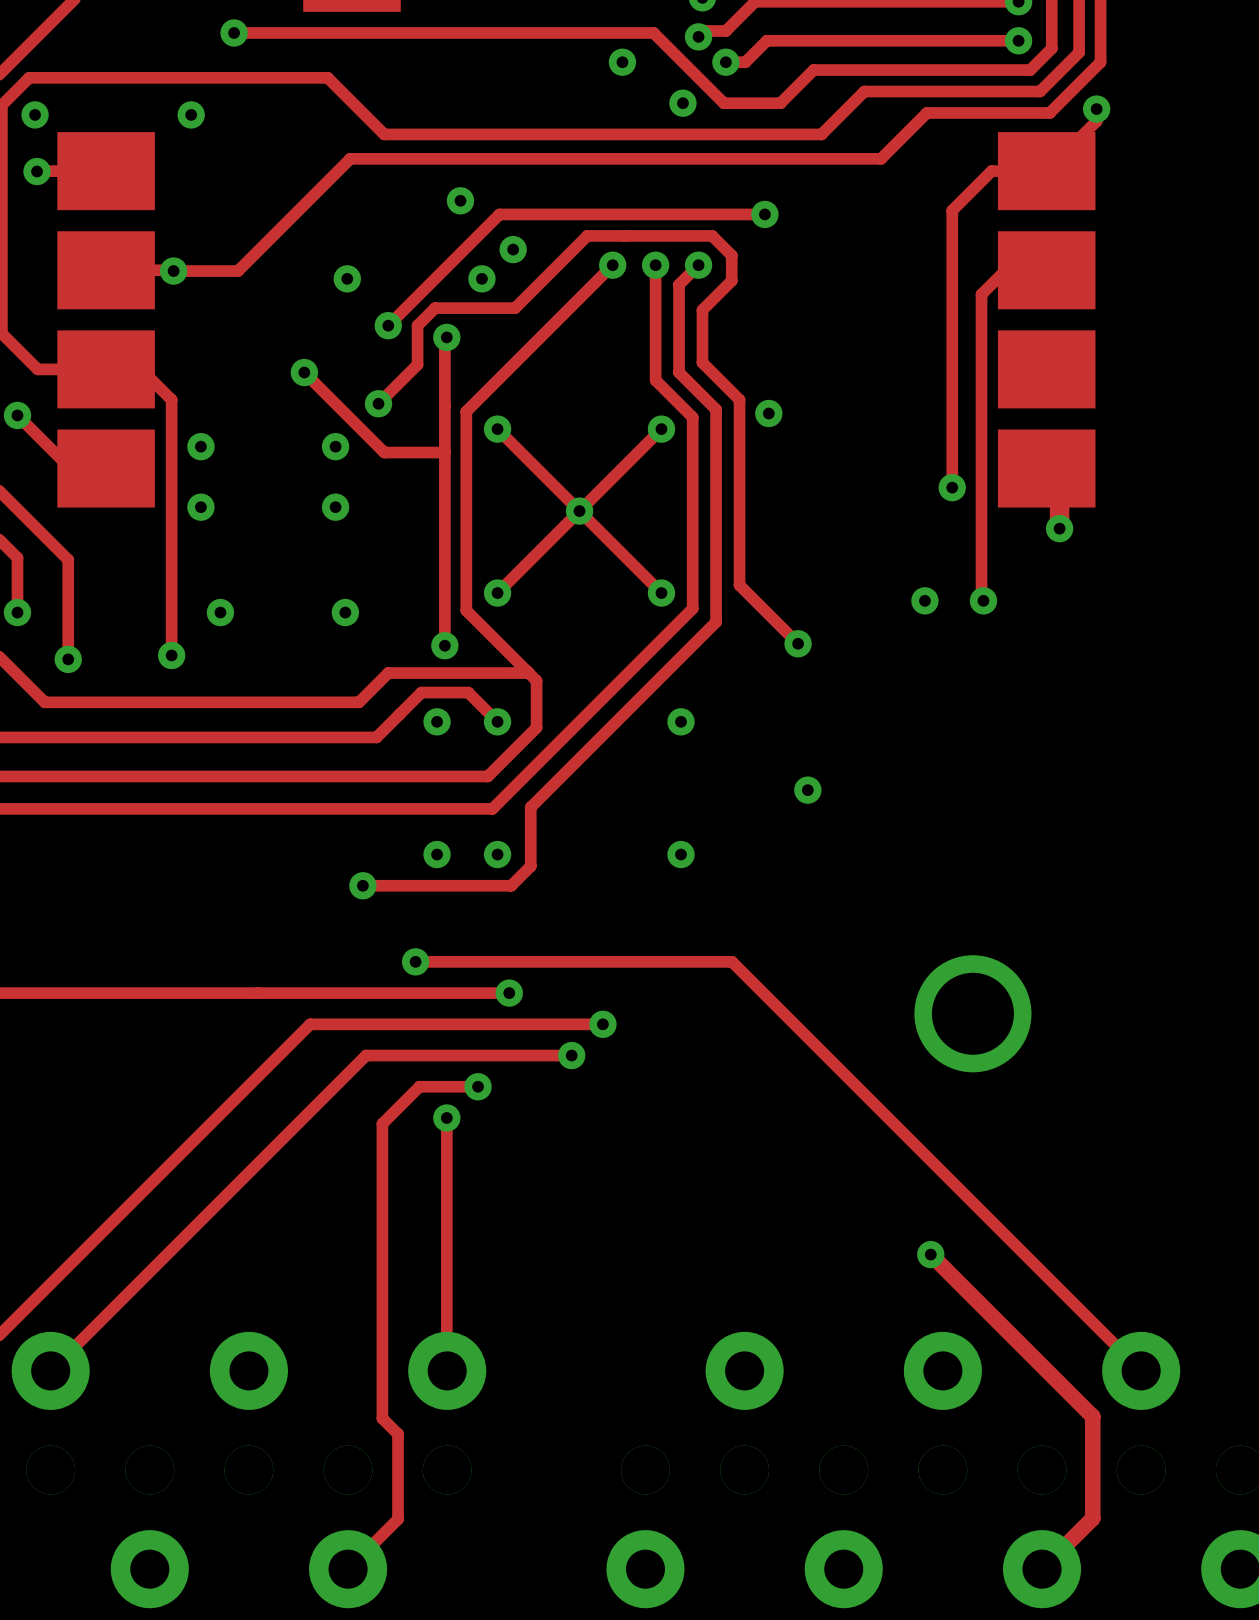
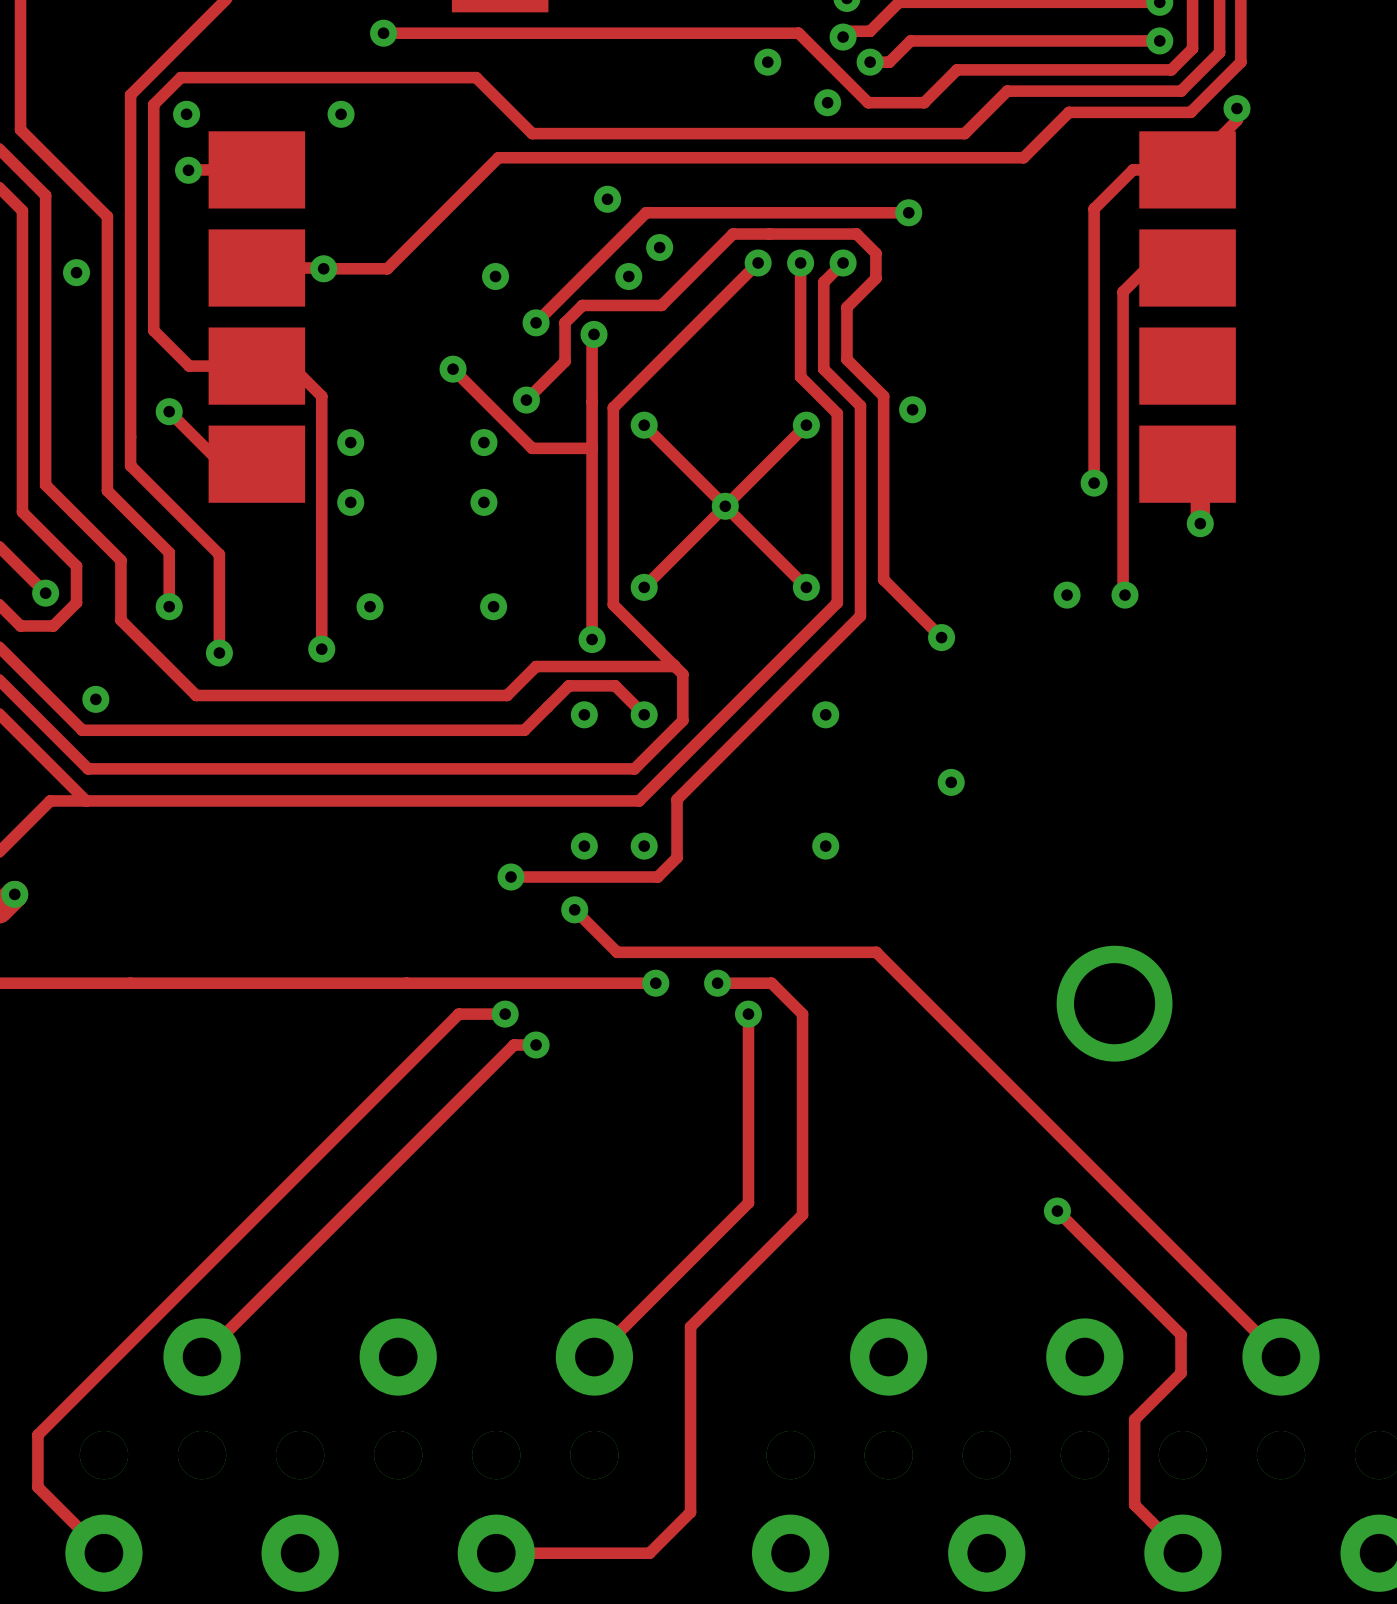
via: none -> (574, 909)
track: (415, 961) (470, 961) -> (574, 909) (617, 952)
via: (415, 961) -> none
track: (357, 1024) (602, 1024) -> none
via: none -> (505, 1014)
track: (388, 1055) (571, 1055) -> none
via: none -> (536, 1045)
via position: (571, 1055) -> (717, 983)
track: (478, 1086) (419, 1086) (382, 1123) (382, 1418) (398, 1434) (398, 1519) (348, 1569) -> (717, 983) (771, 983) (802, 1014) (802, 1214) (690, 1326) (690, 1512) (649, 1553) (496, 1553)
via: (478, 1086) -> none
track: (446, 1117) (446, 1370) -> (748, 1014) (748, 1202) (594, 1357)
via: (446, 1117) -> none
track: (930, 1254) (1092, 1416) (1092, 1518) (1042, 1569) -> (1057, 1211) (1181, 1334) (1181, 1373) (1134, 1419) (1134, 1504) (1182, 1553)
via position: (930, 1254) -> (1057, 1211)

